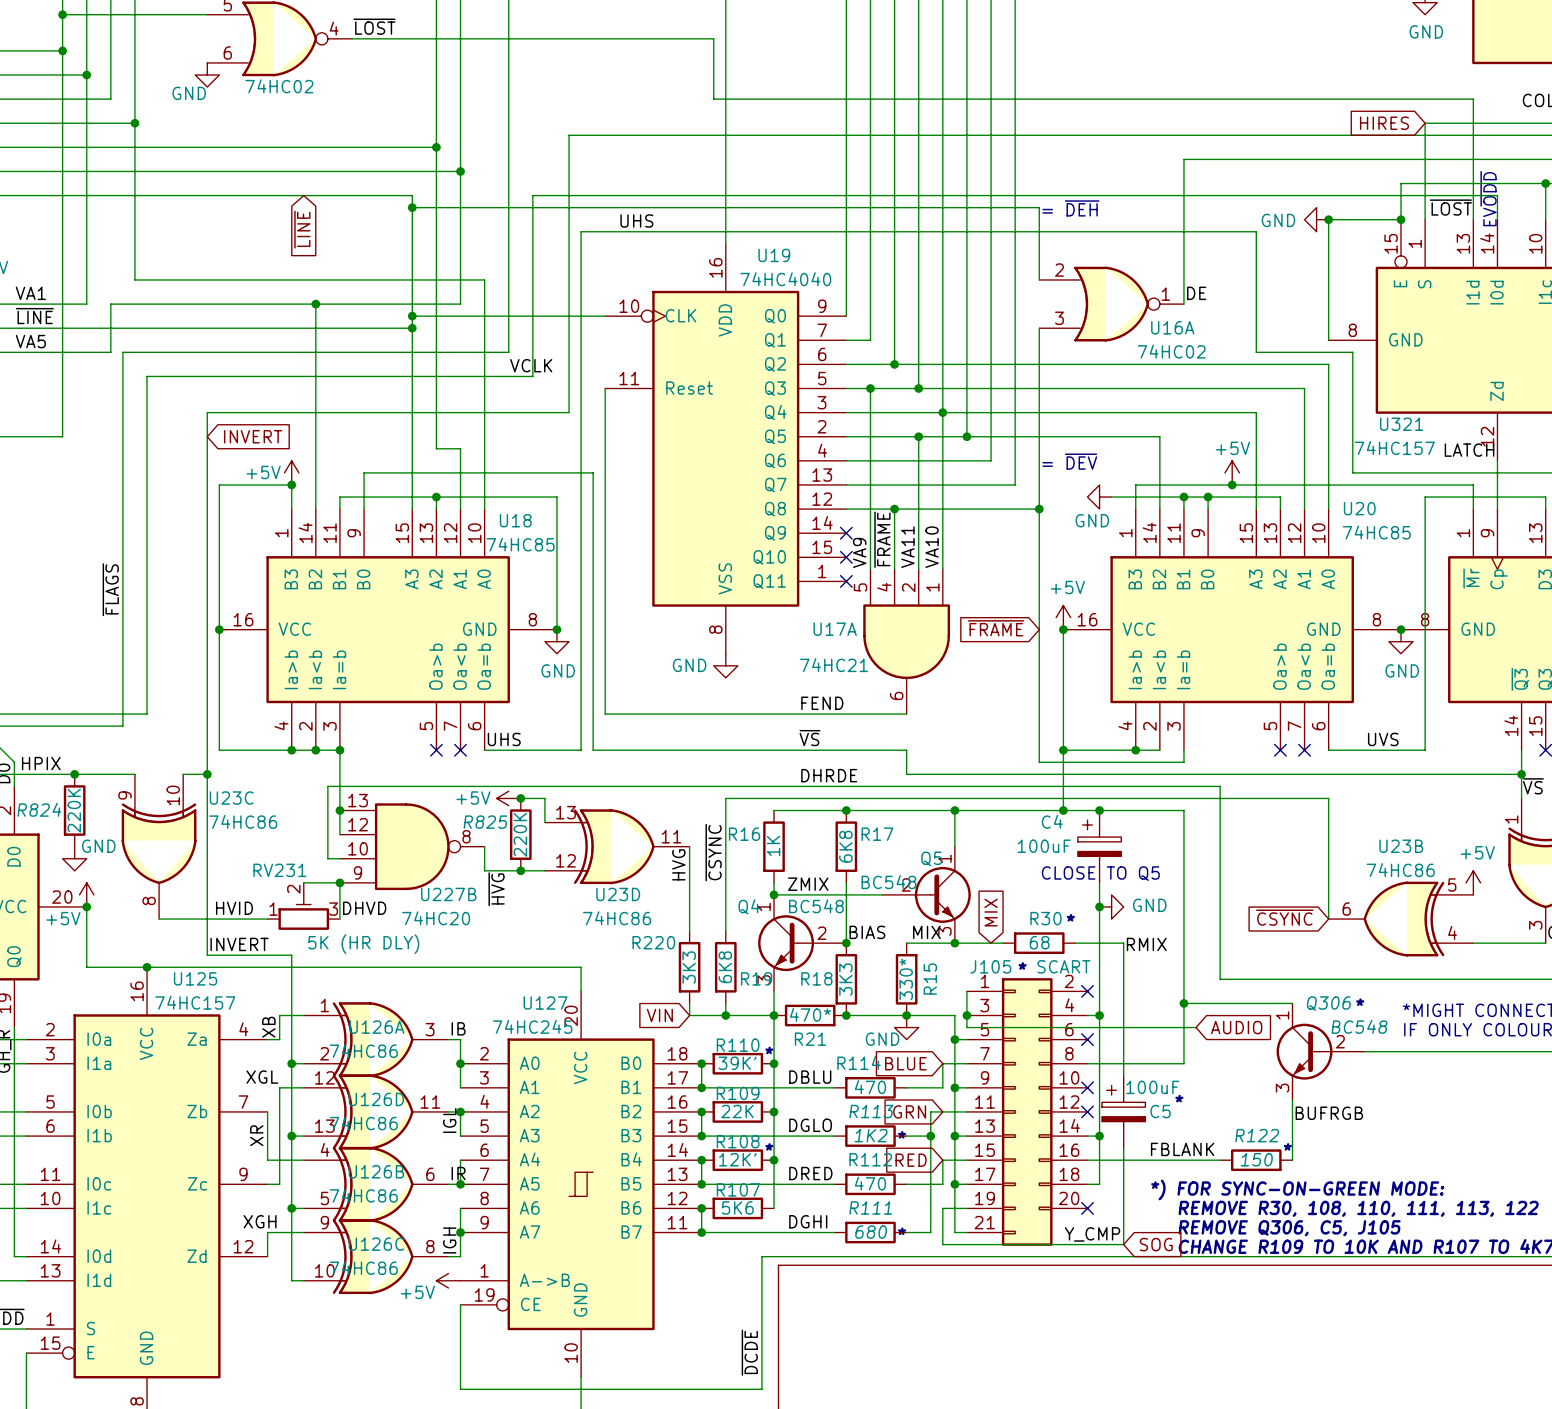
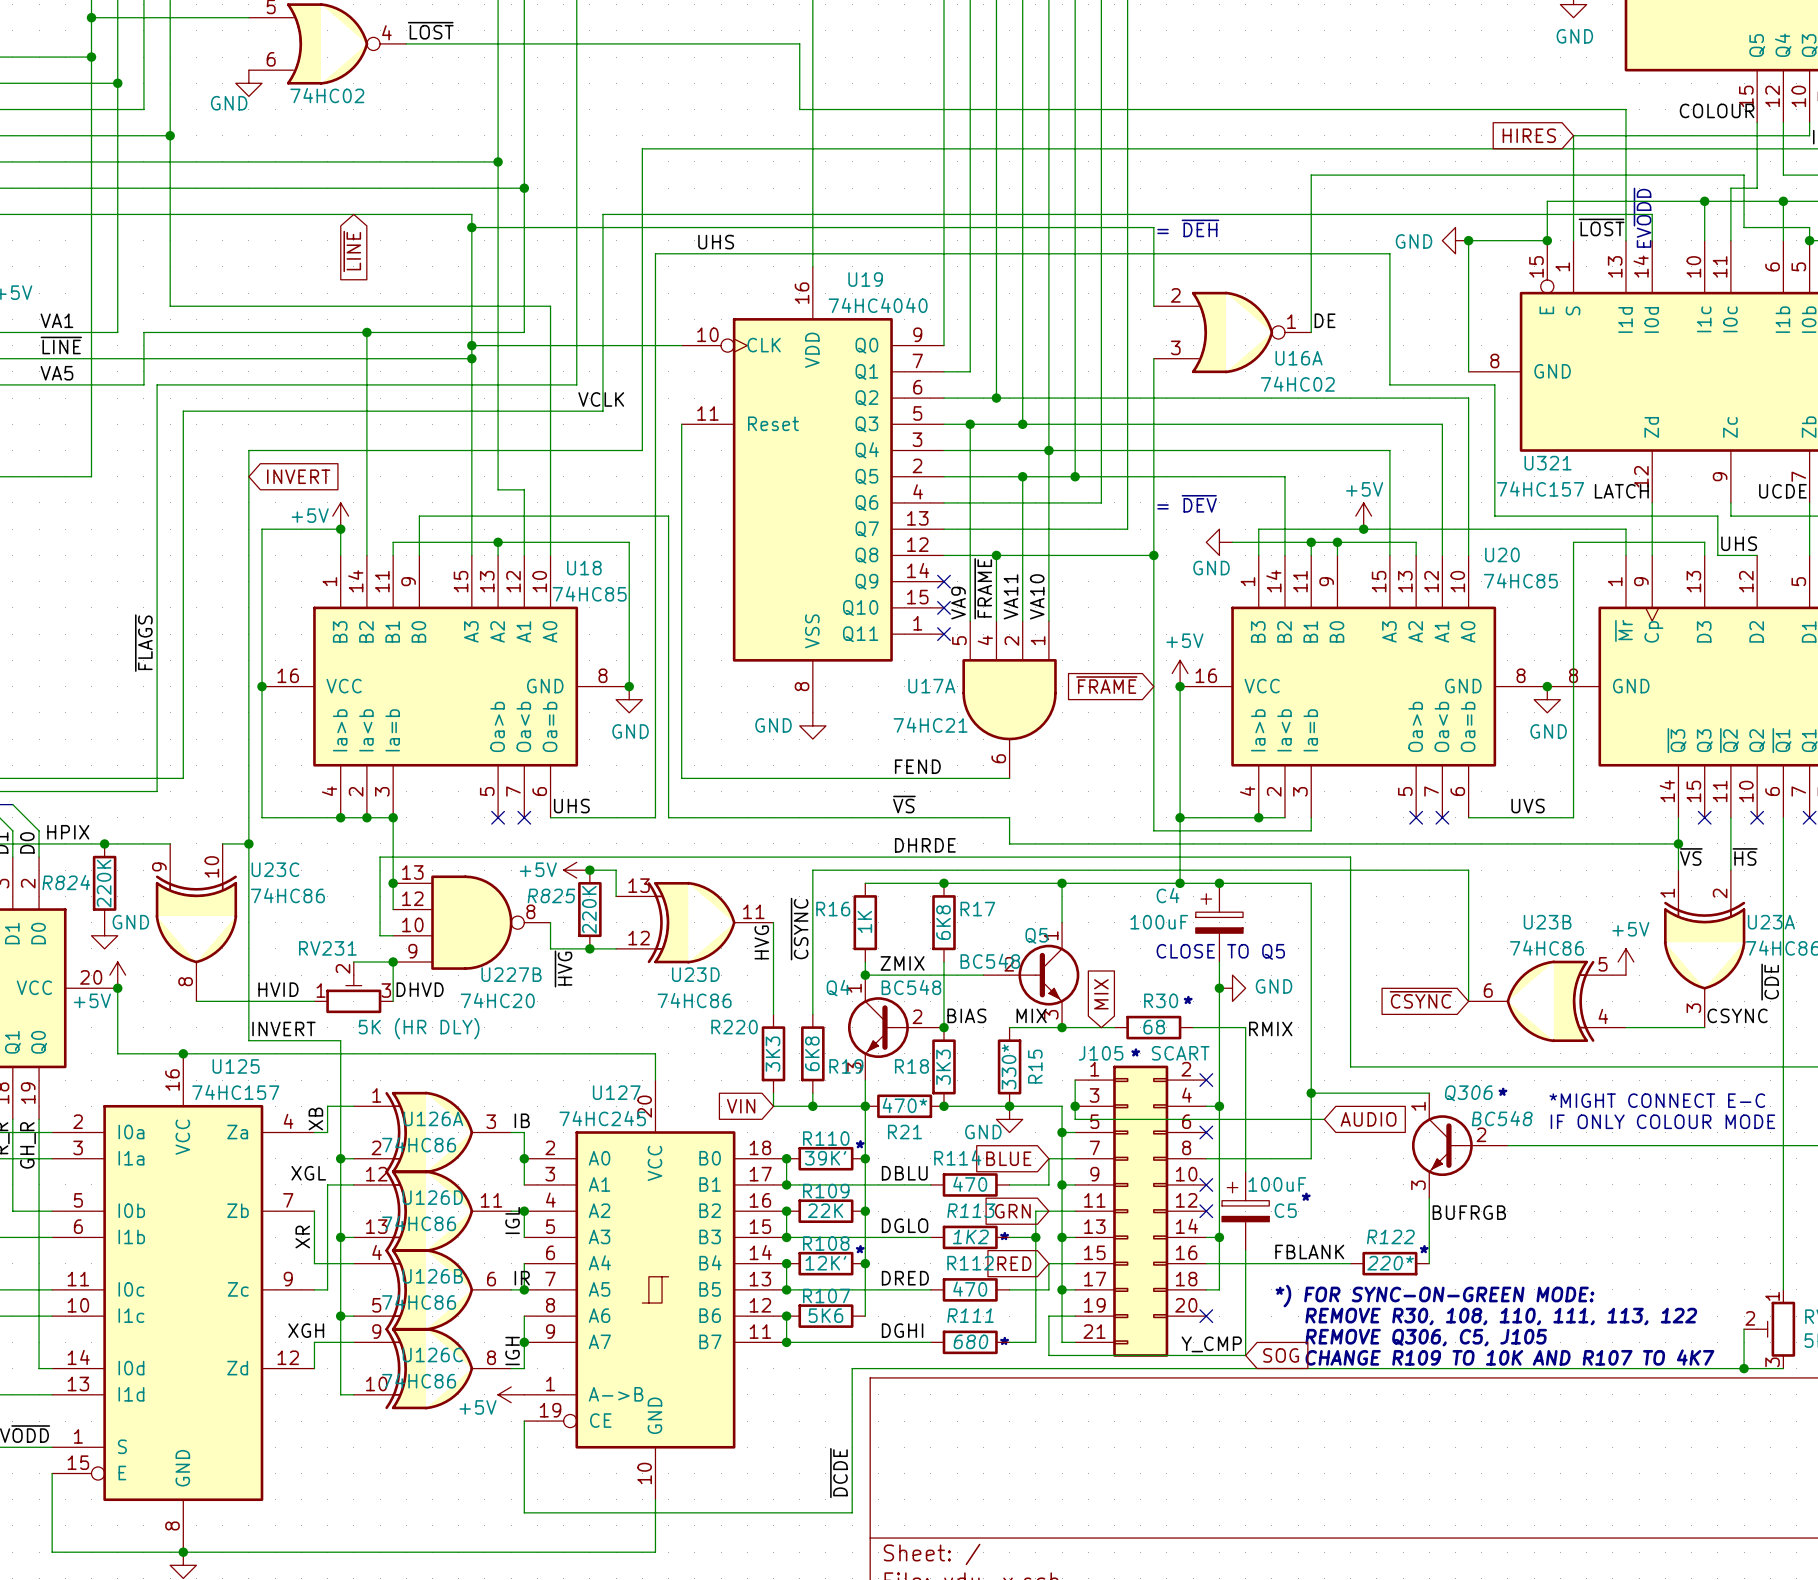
R122 value: 150 (1256, 1159) -> 220* (1390, 1263)

